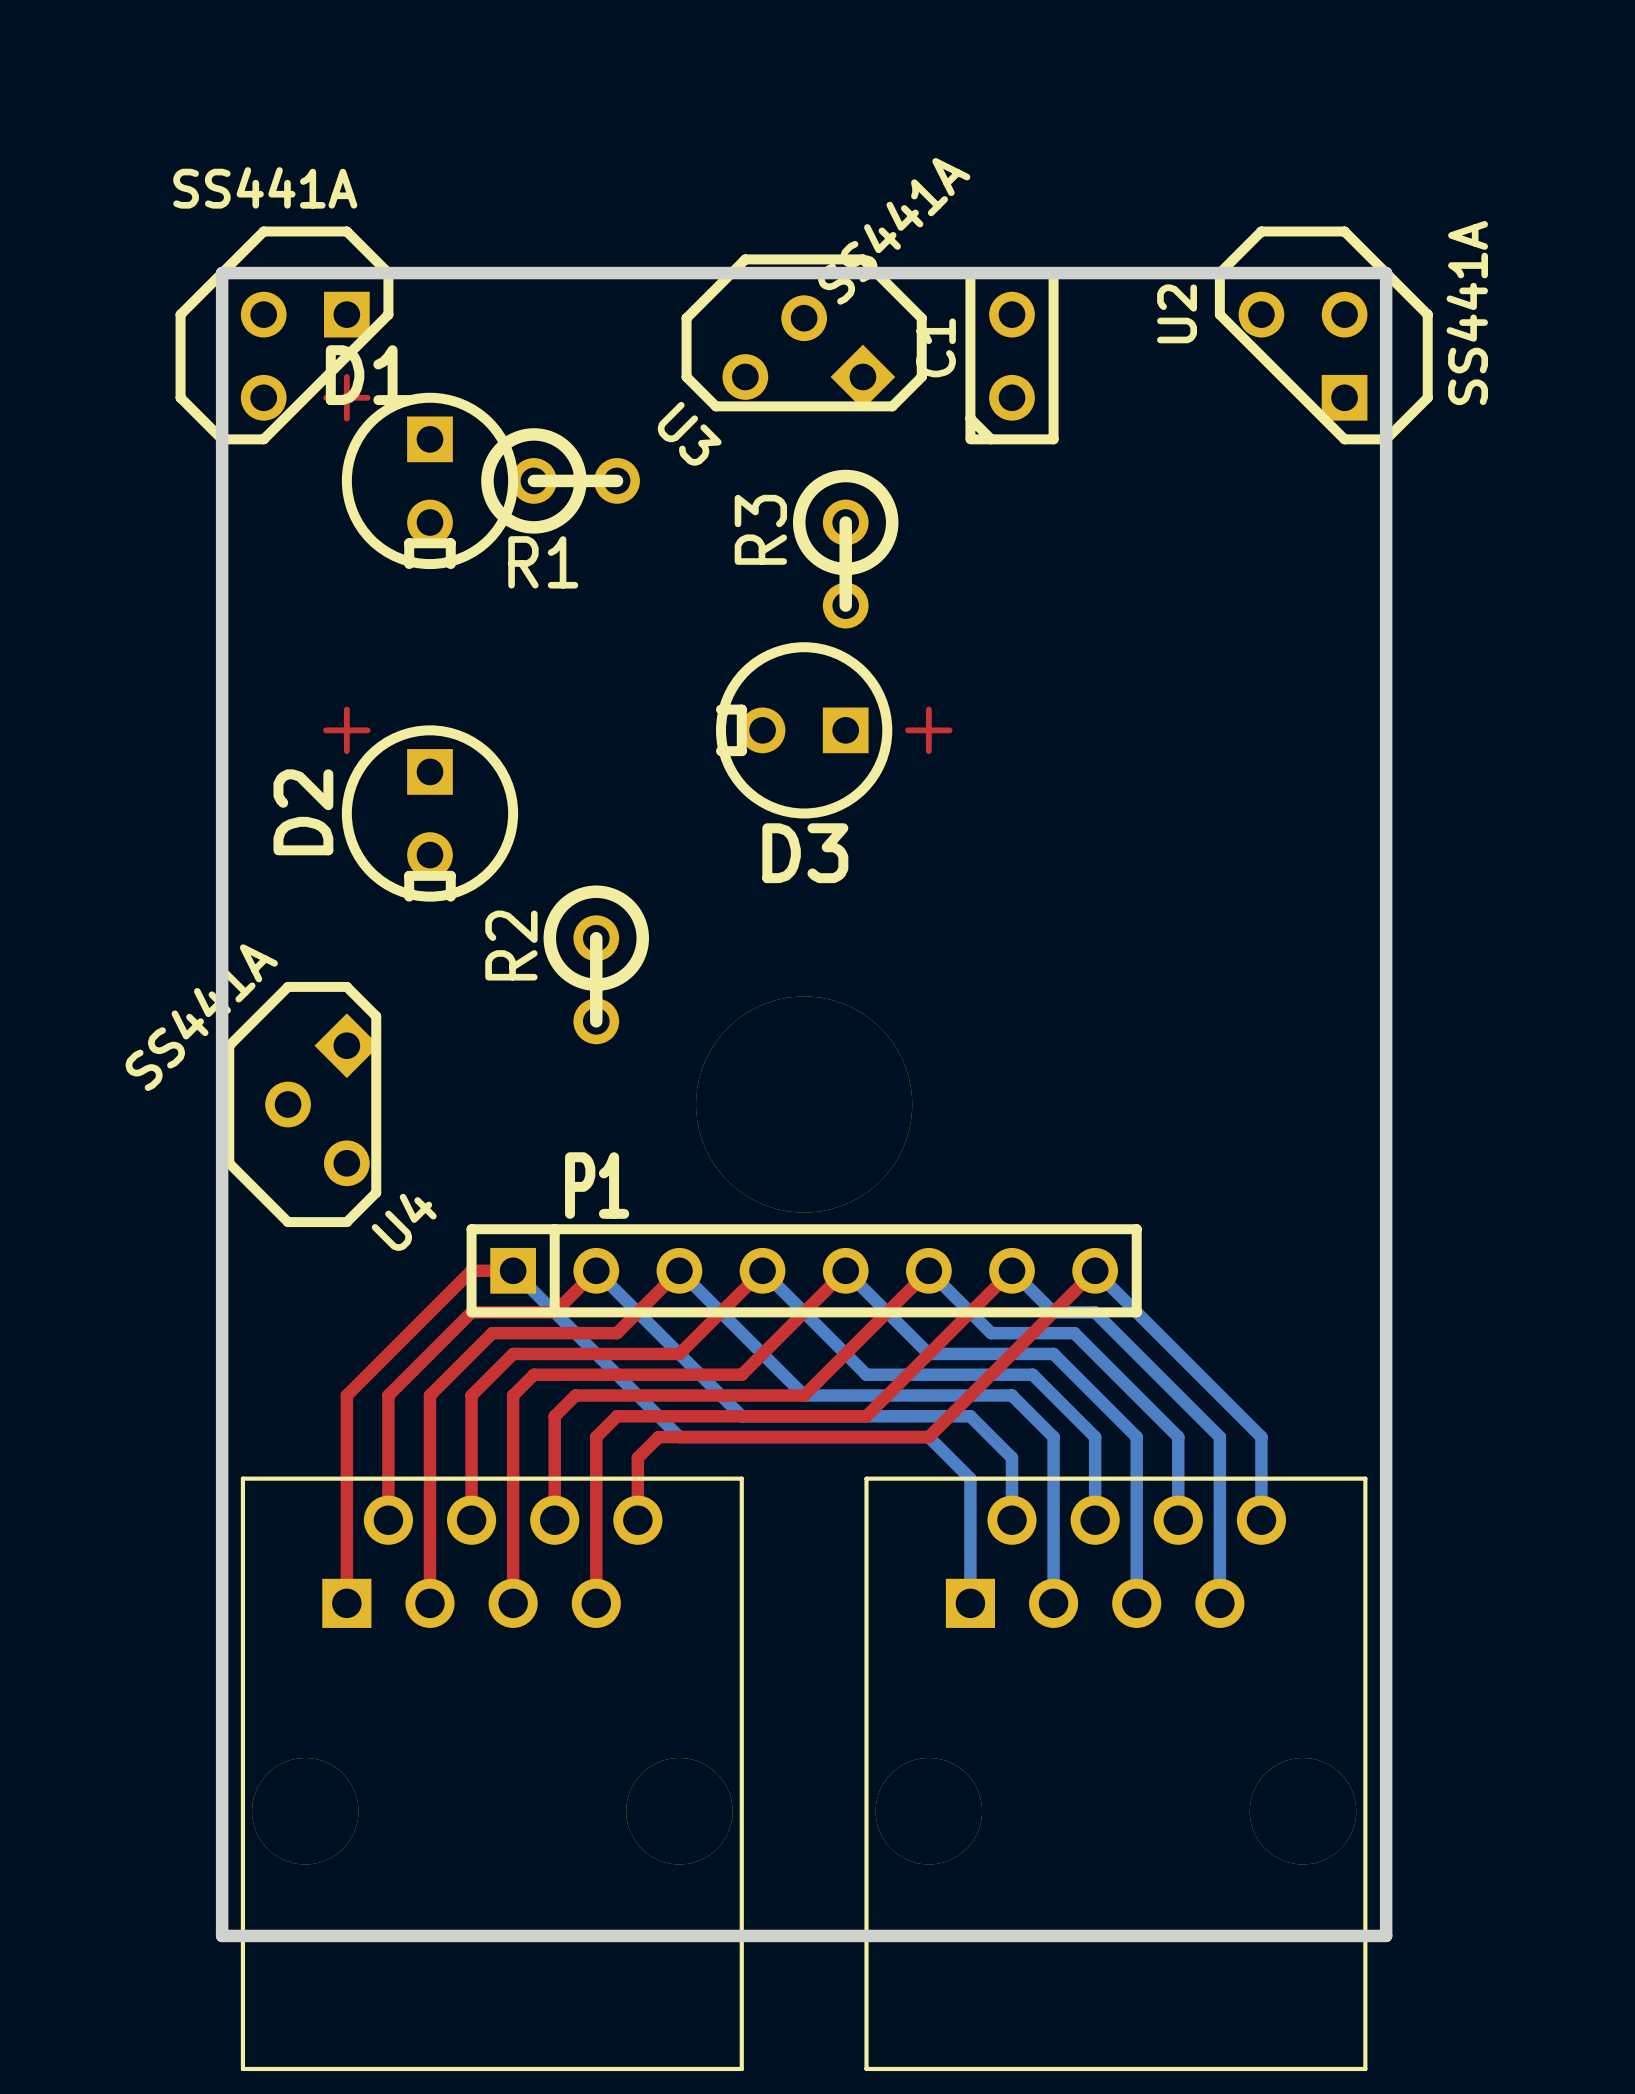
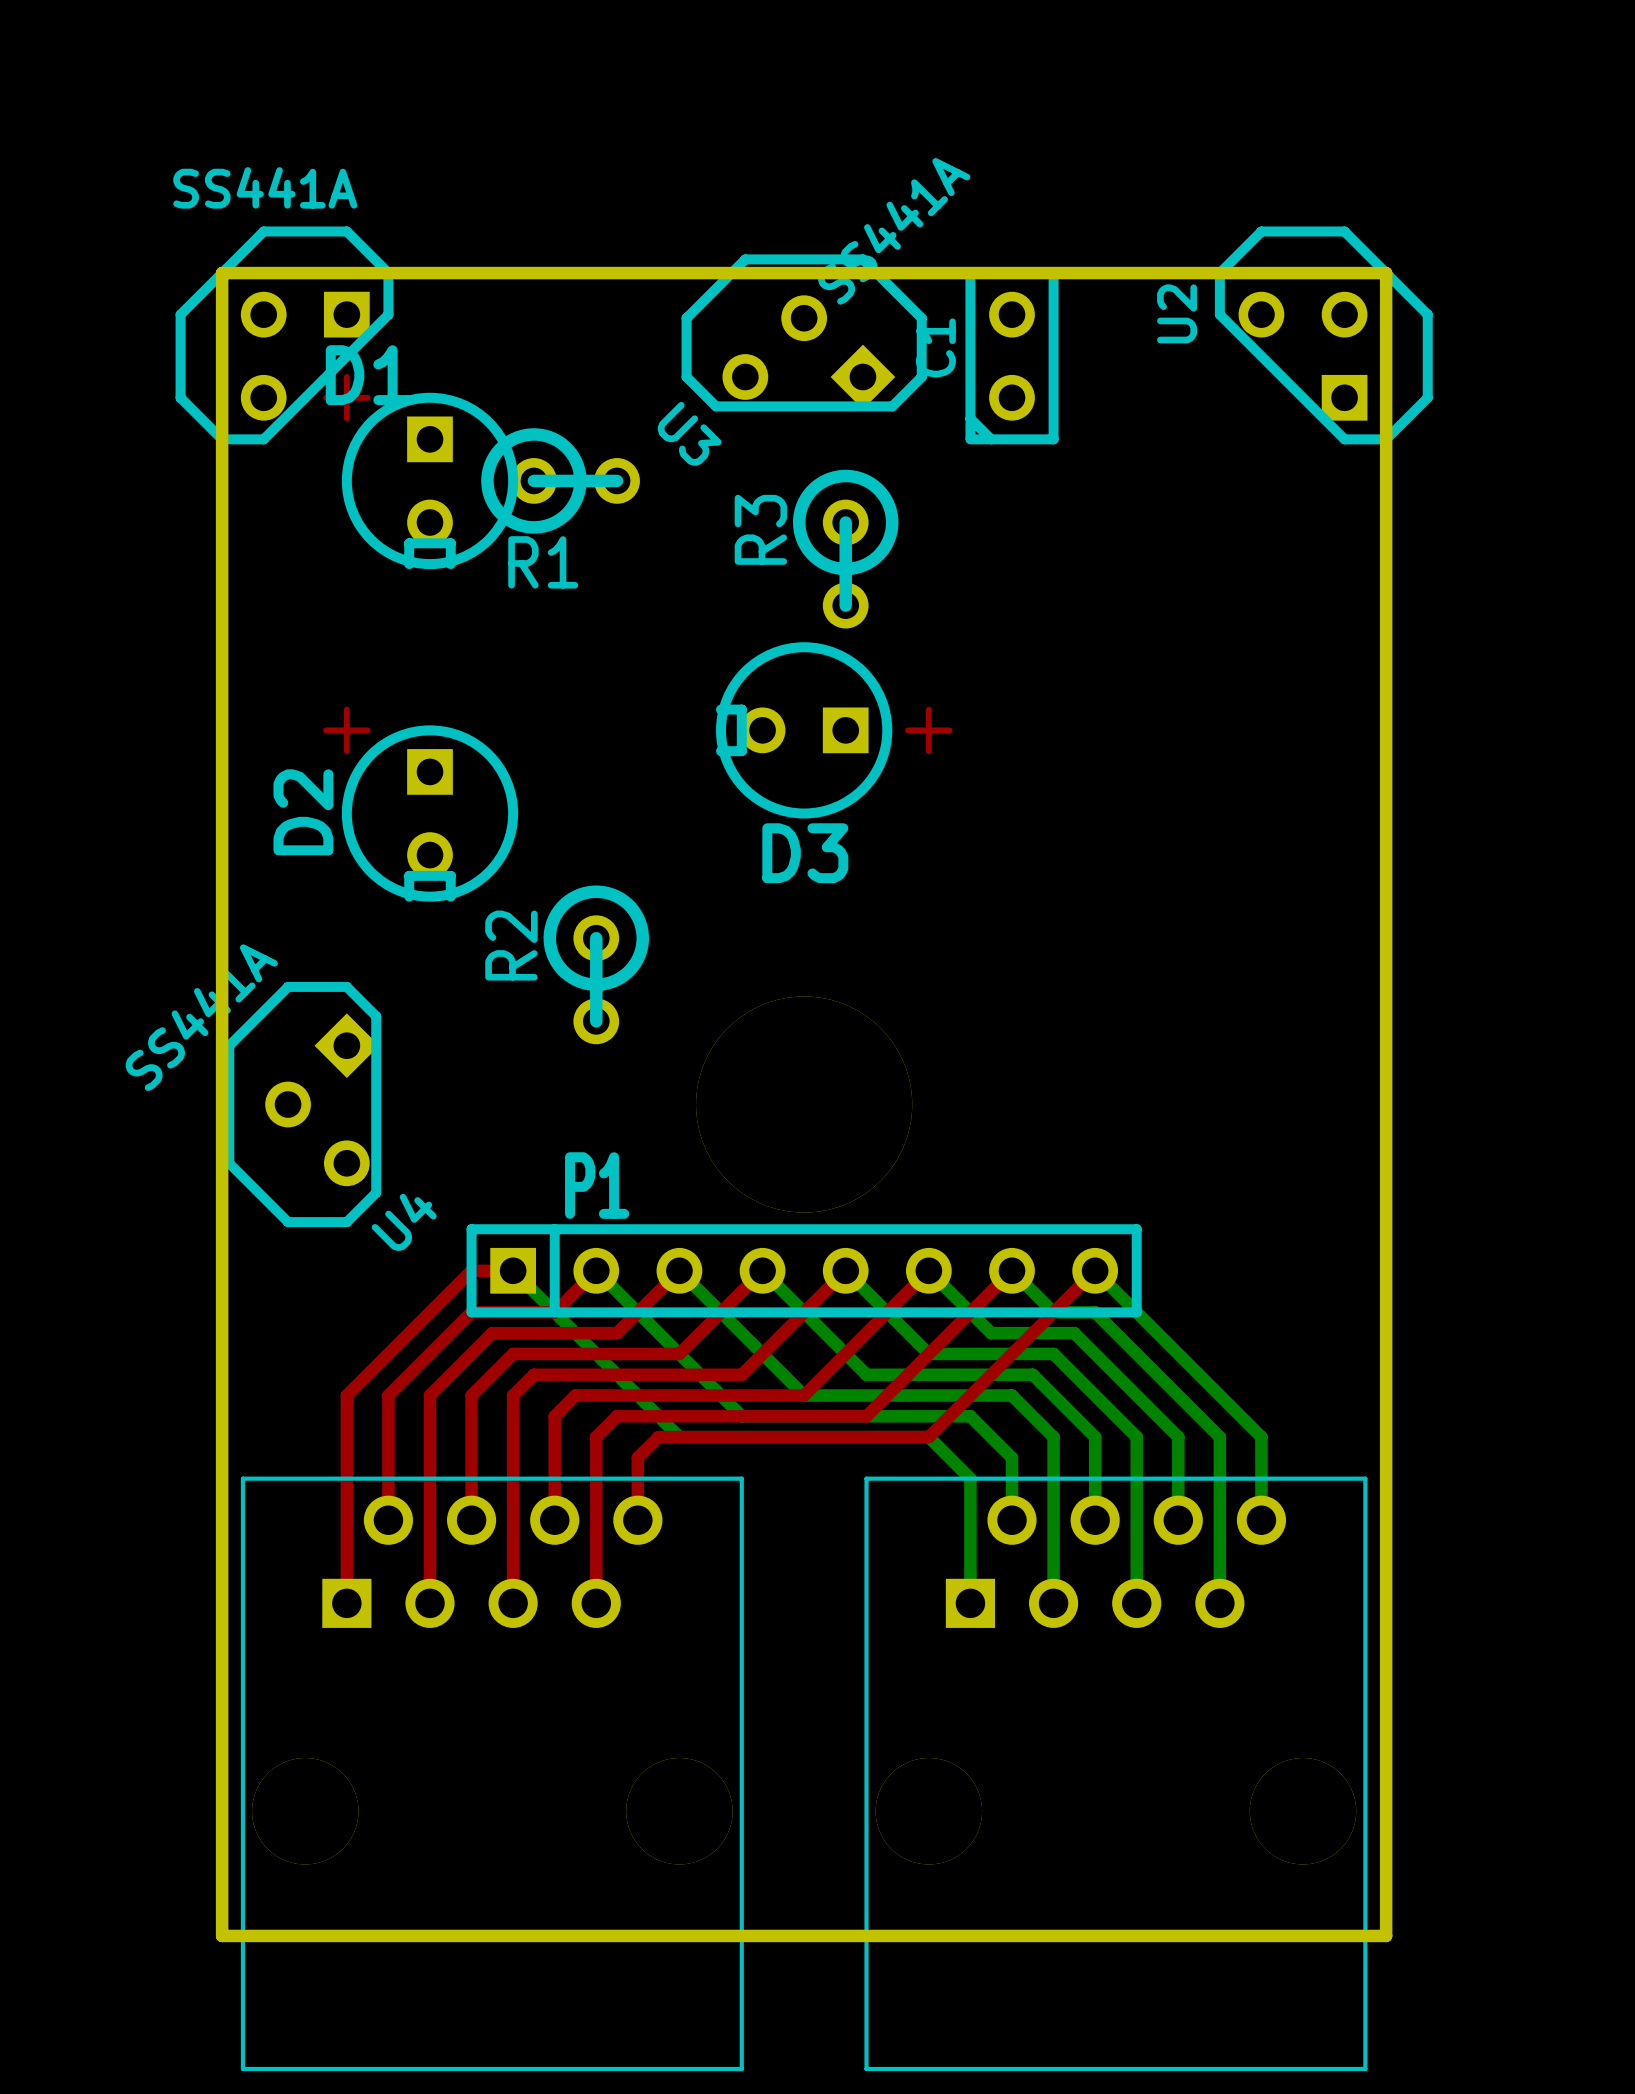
U2 value: SS441A (1467, 313) -> none

